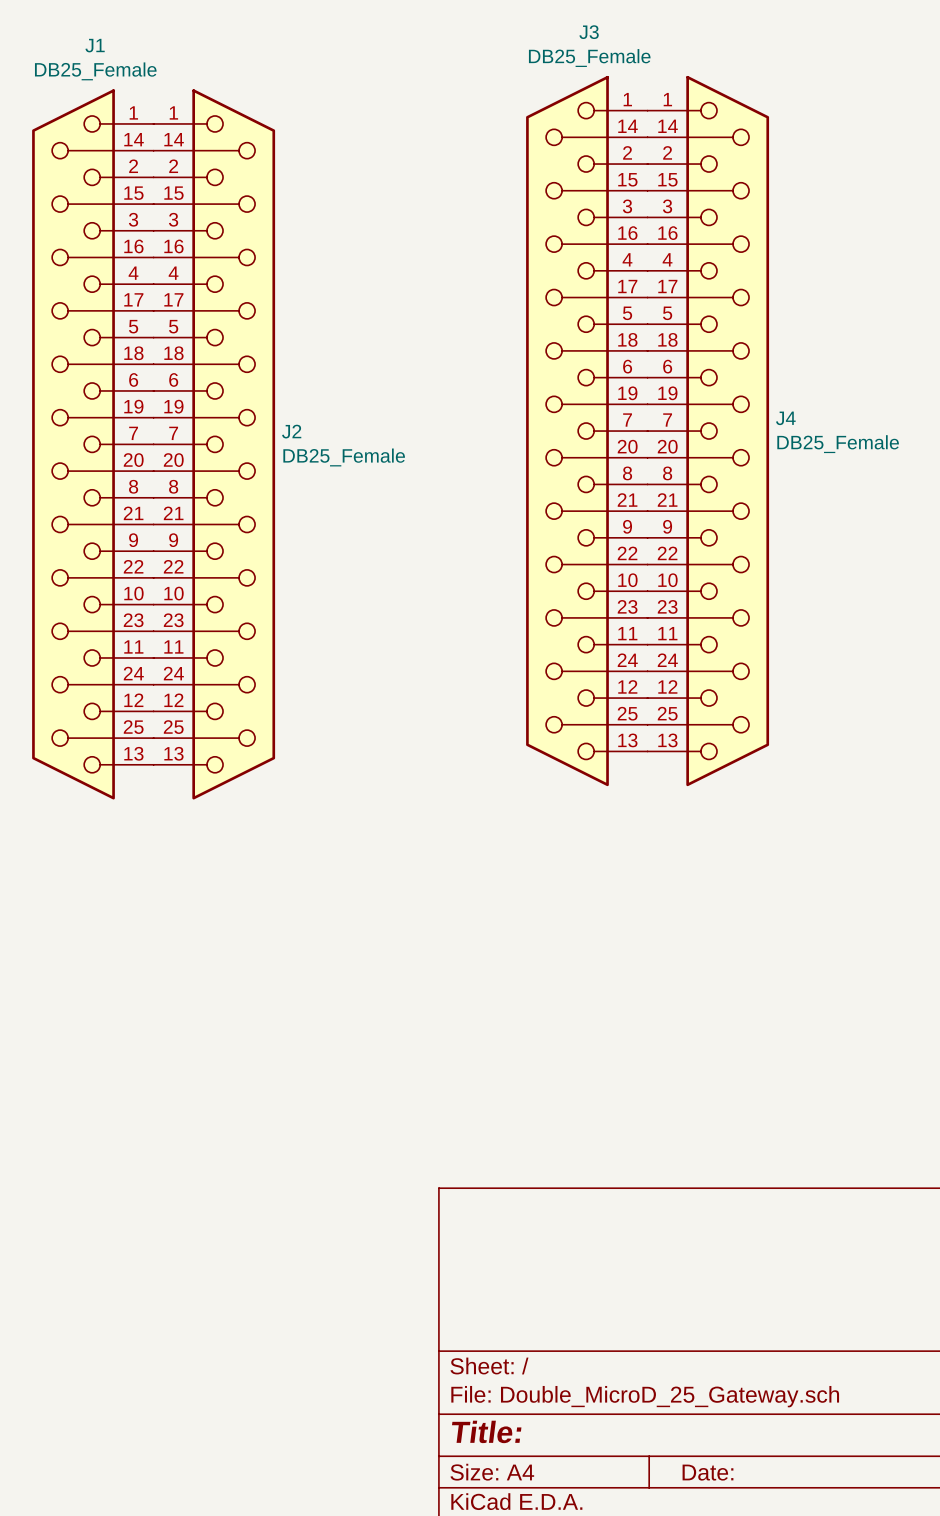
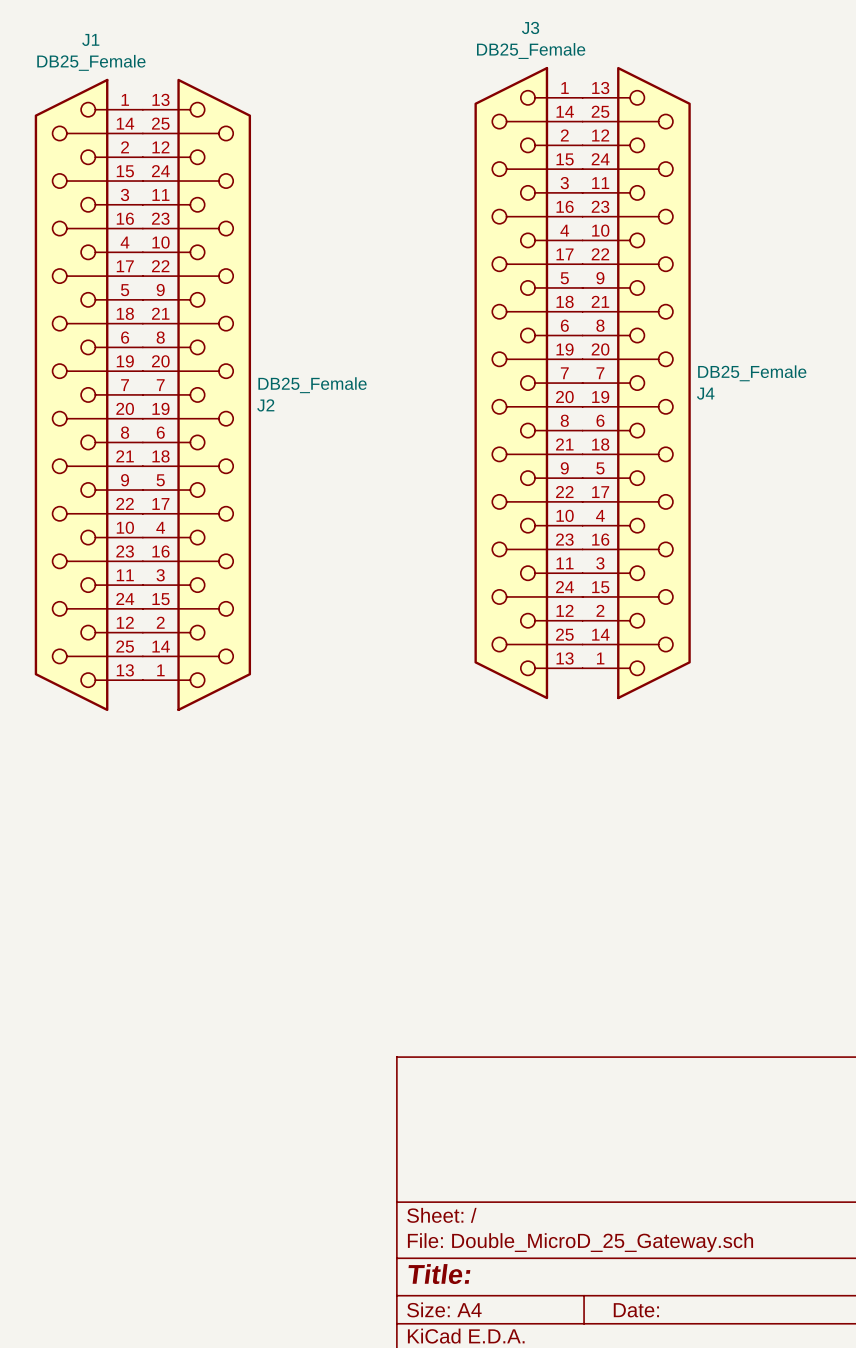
J4 flip: as is (727, 431) -> up-down (653, 383)
J2 flip: as is (233, 444) -> up-down (214, 394)

